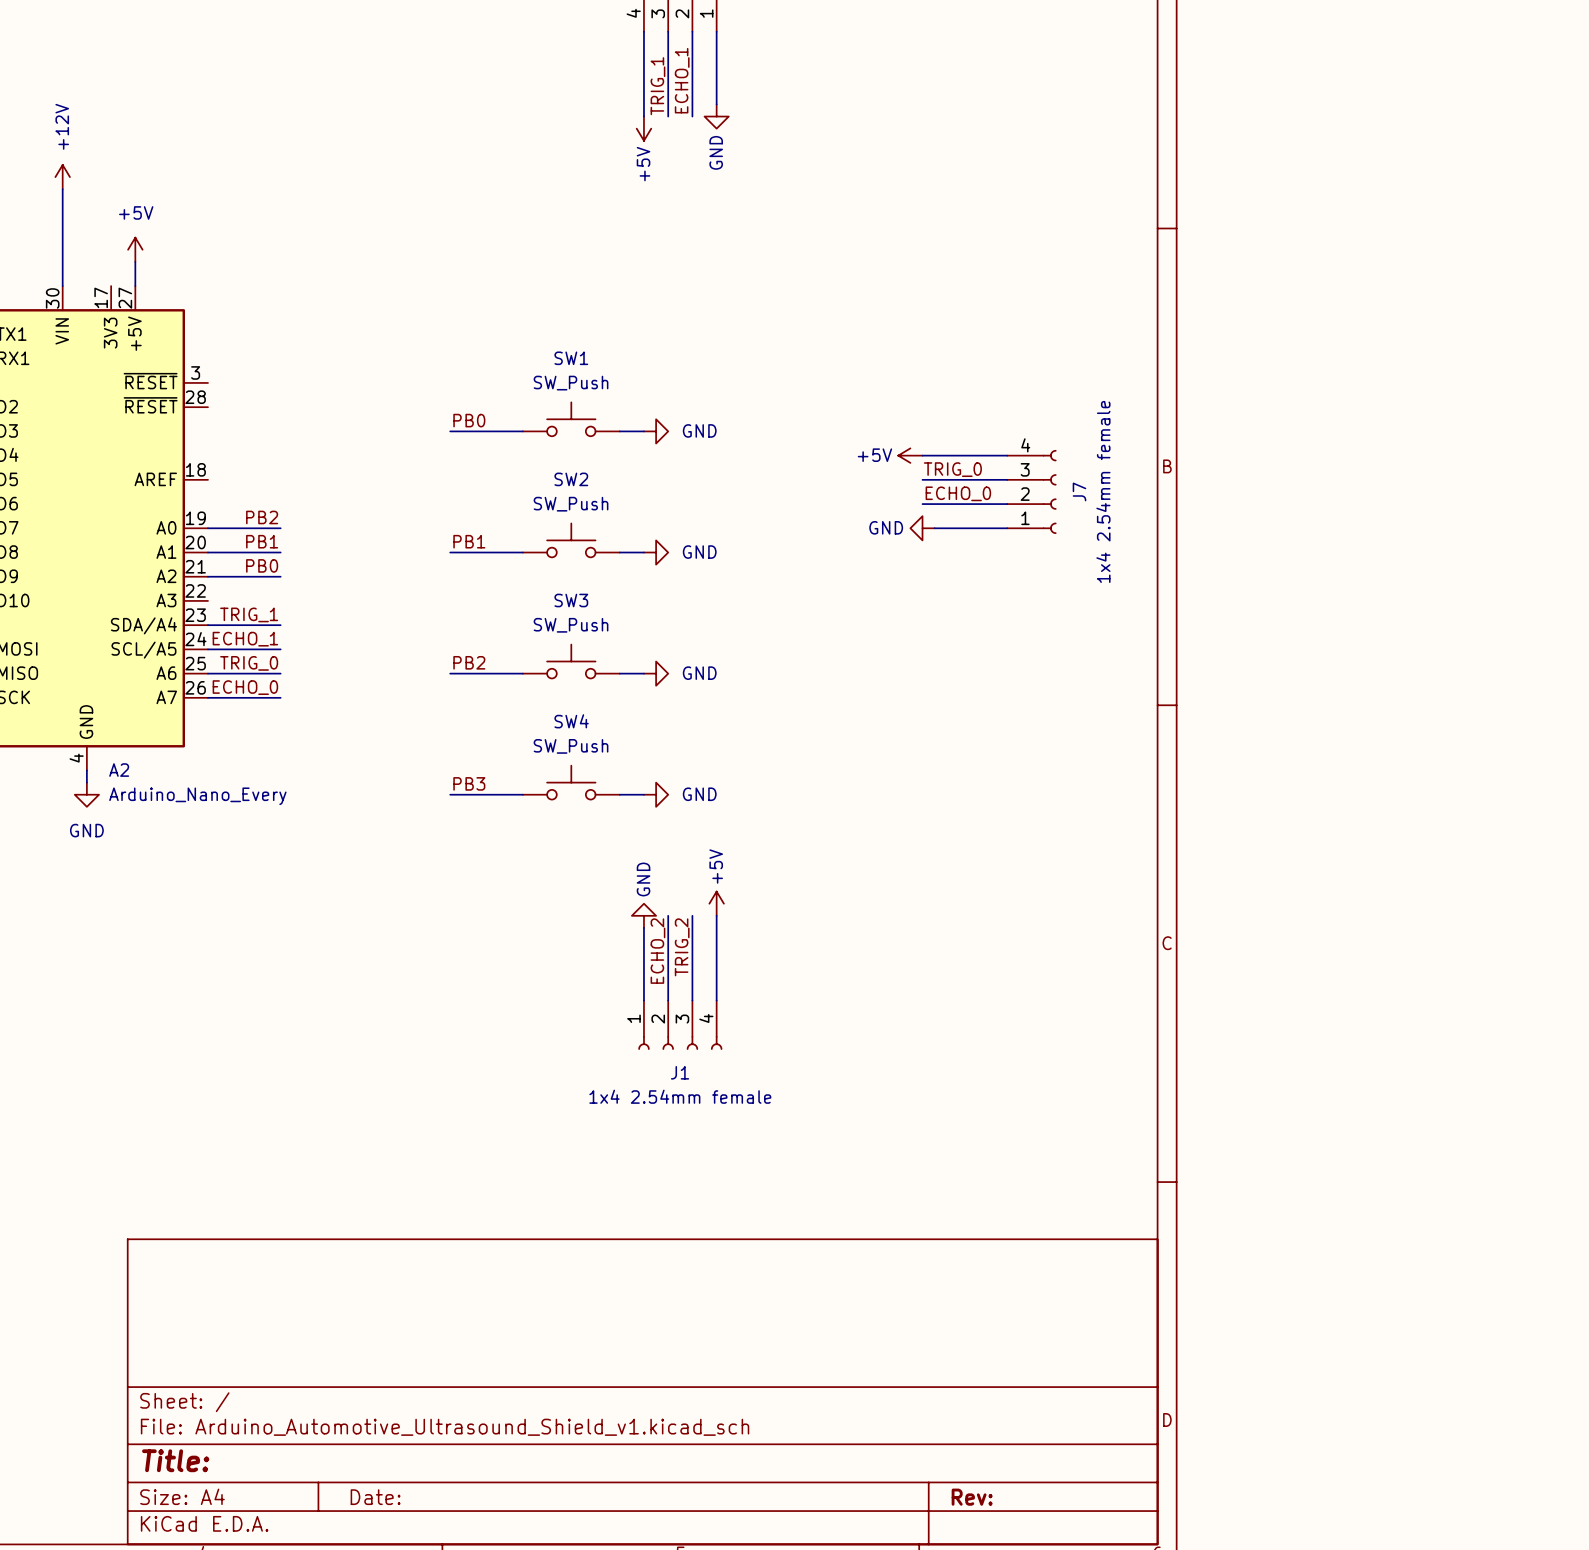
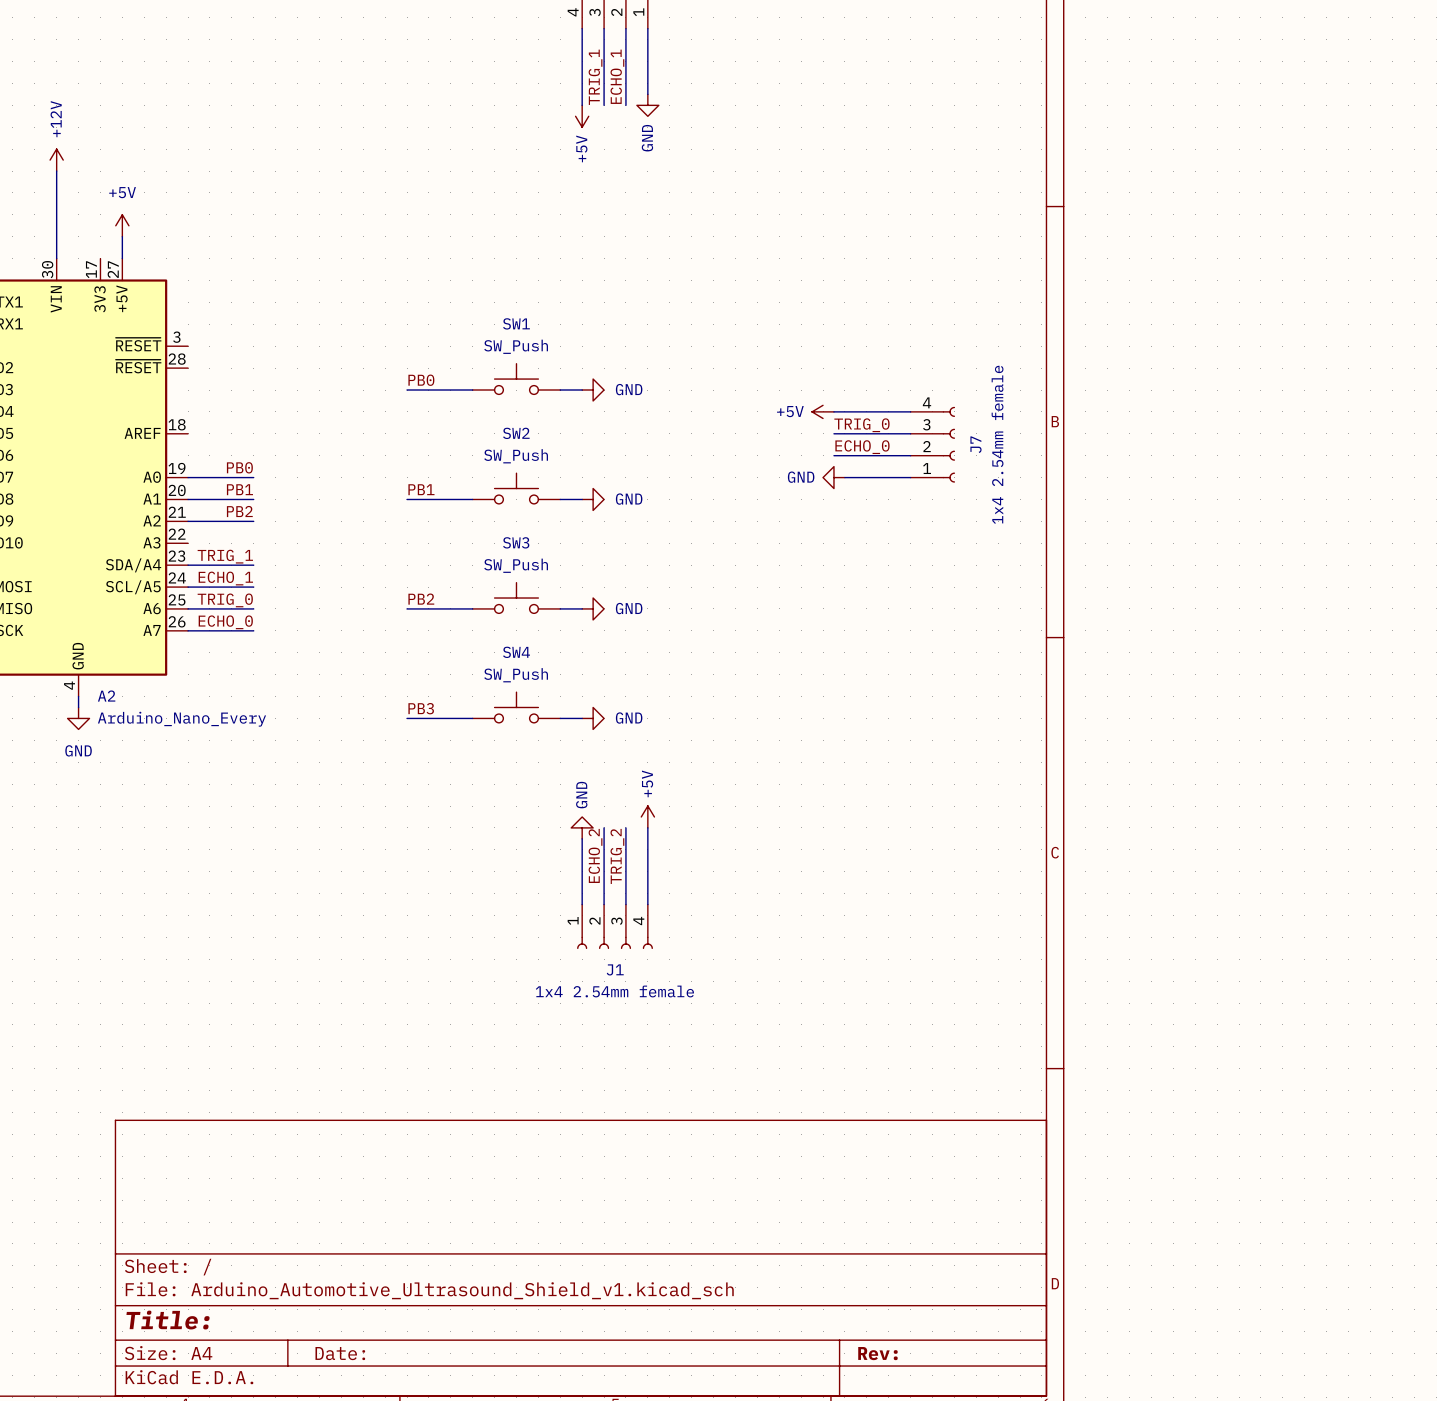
label: PB2 (262, 517) -> PB0 (239, 467)
label: PB0 (262, 565) -> PB2 (239, 511)

